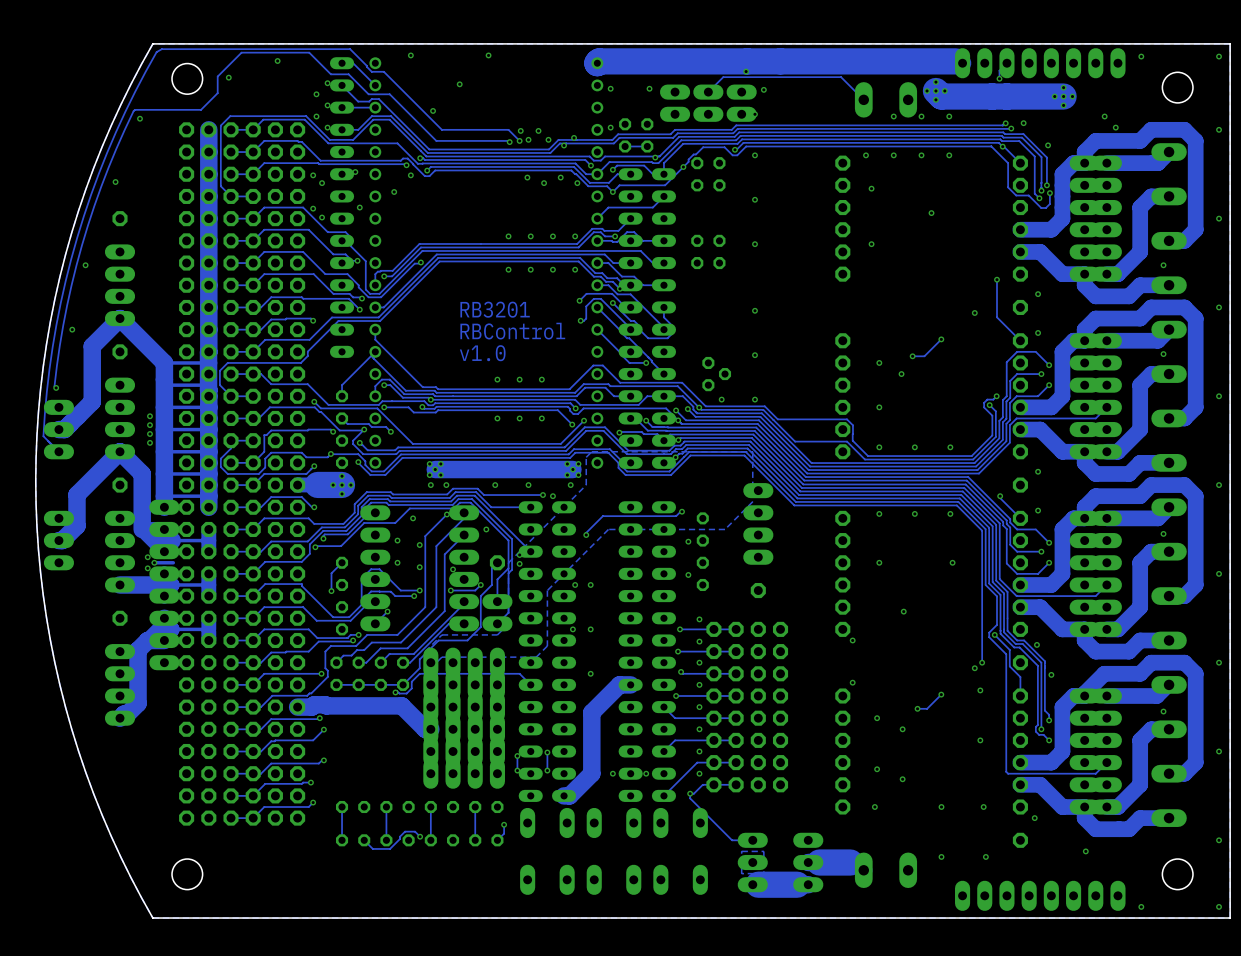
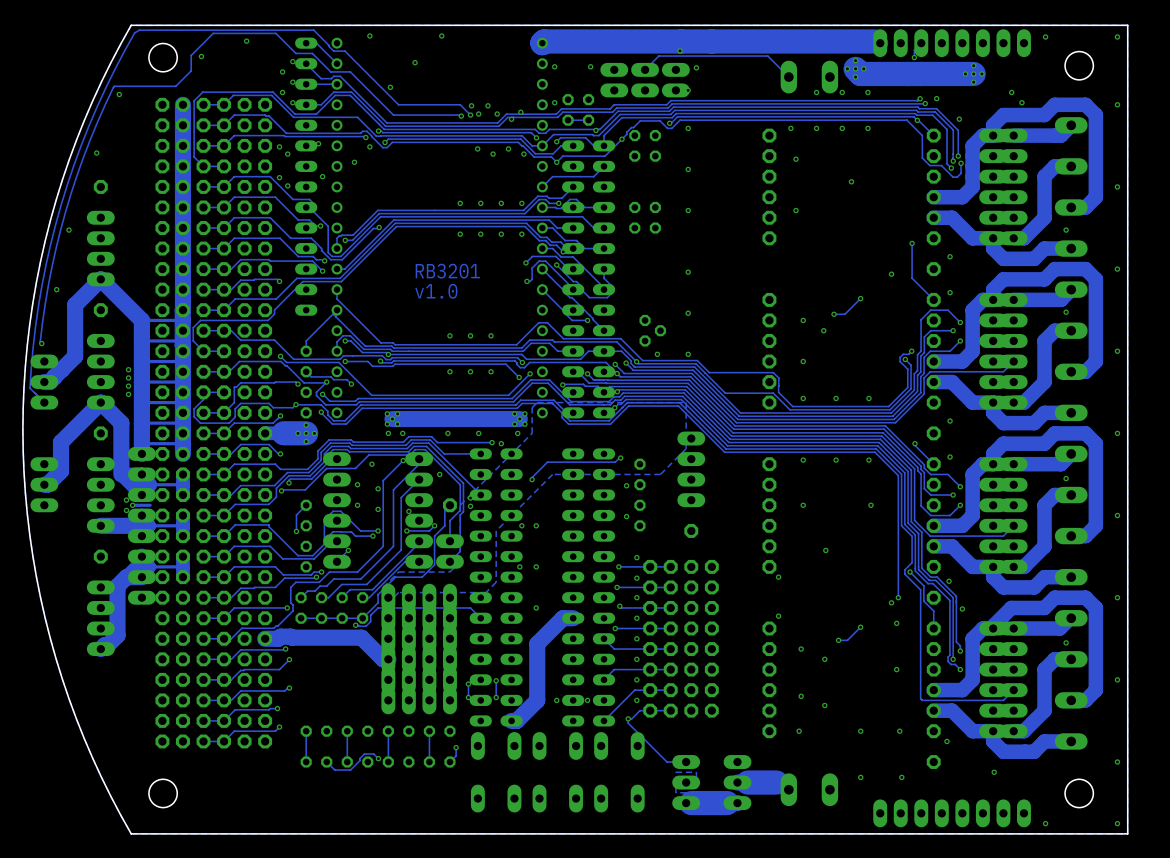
text: RBControl (512, 331) -> v1.0 (436, 291)
text: v1.0 (482, 353) -> none

